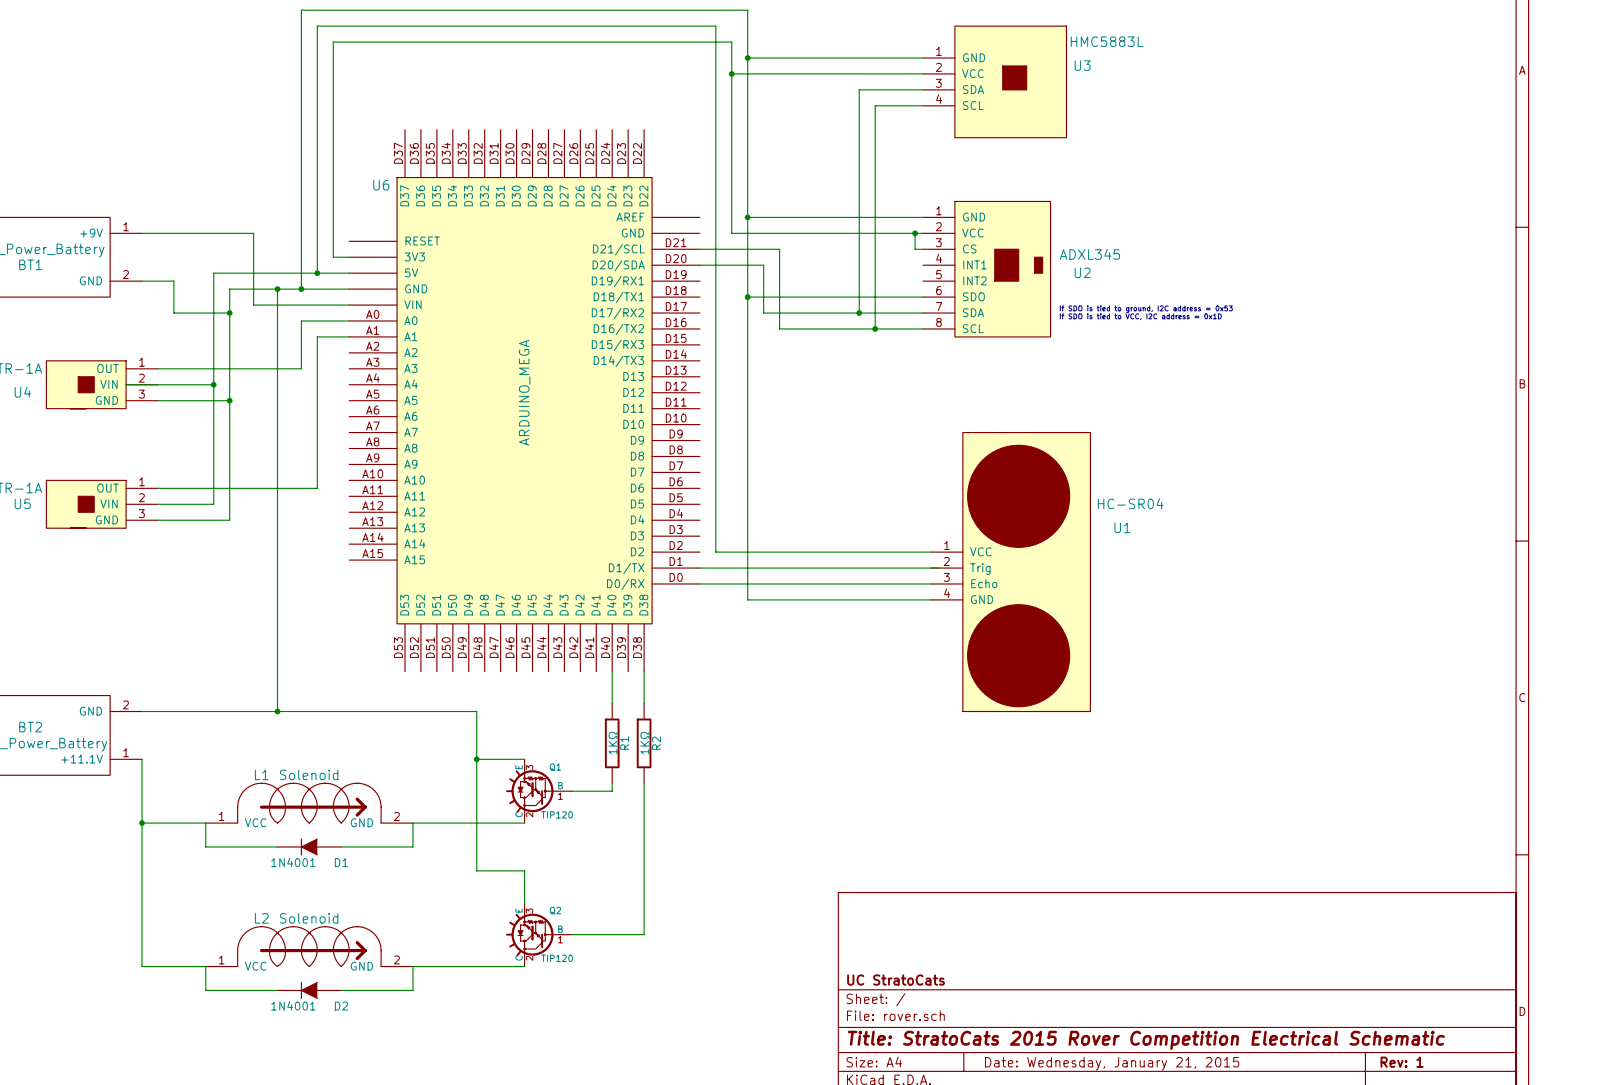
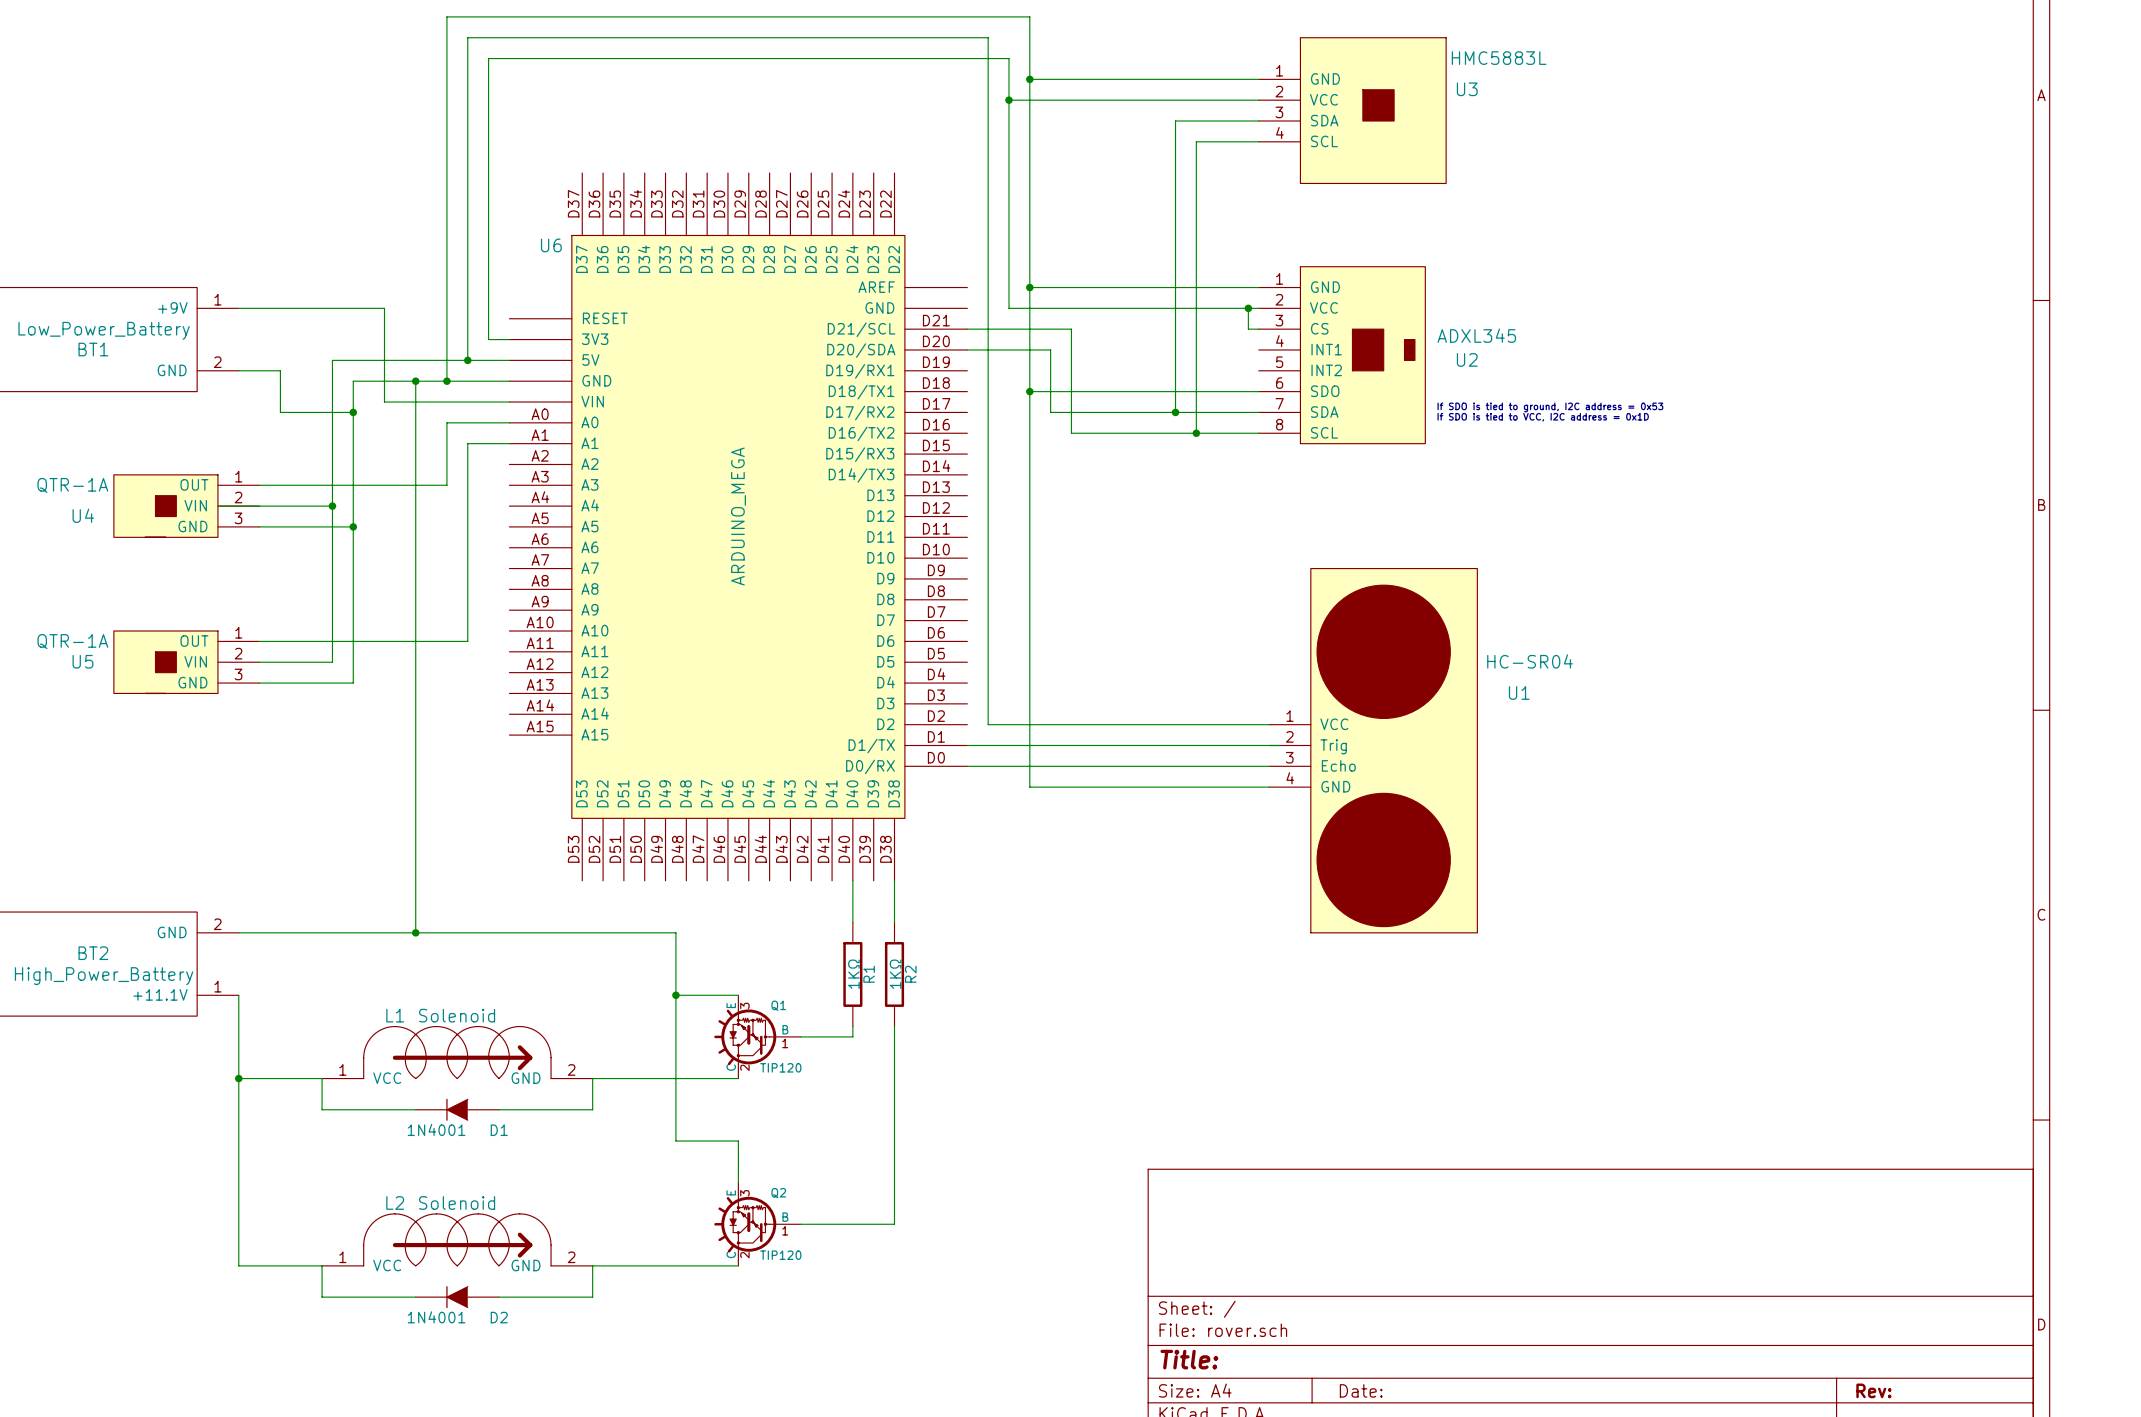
title block: UC StratoCats (896, 980) -> none
title block: Title: StratoCats 2015 Rover Competition Electrical Schematic (1146, 1040) -> Title: (1189, 1359)
title block: Rev: 1 (1402, 1062) -> Rev: (1873, 1390)
title block: Date: Wednesday, January 21, 2015 (1112, 1063) -> Date: (1361, 1390)

